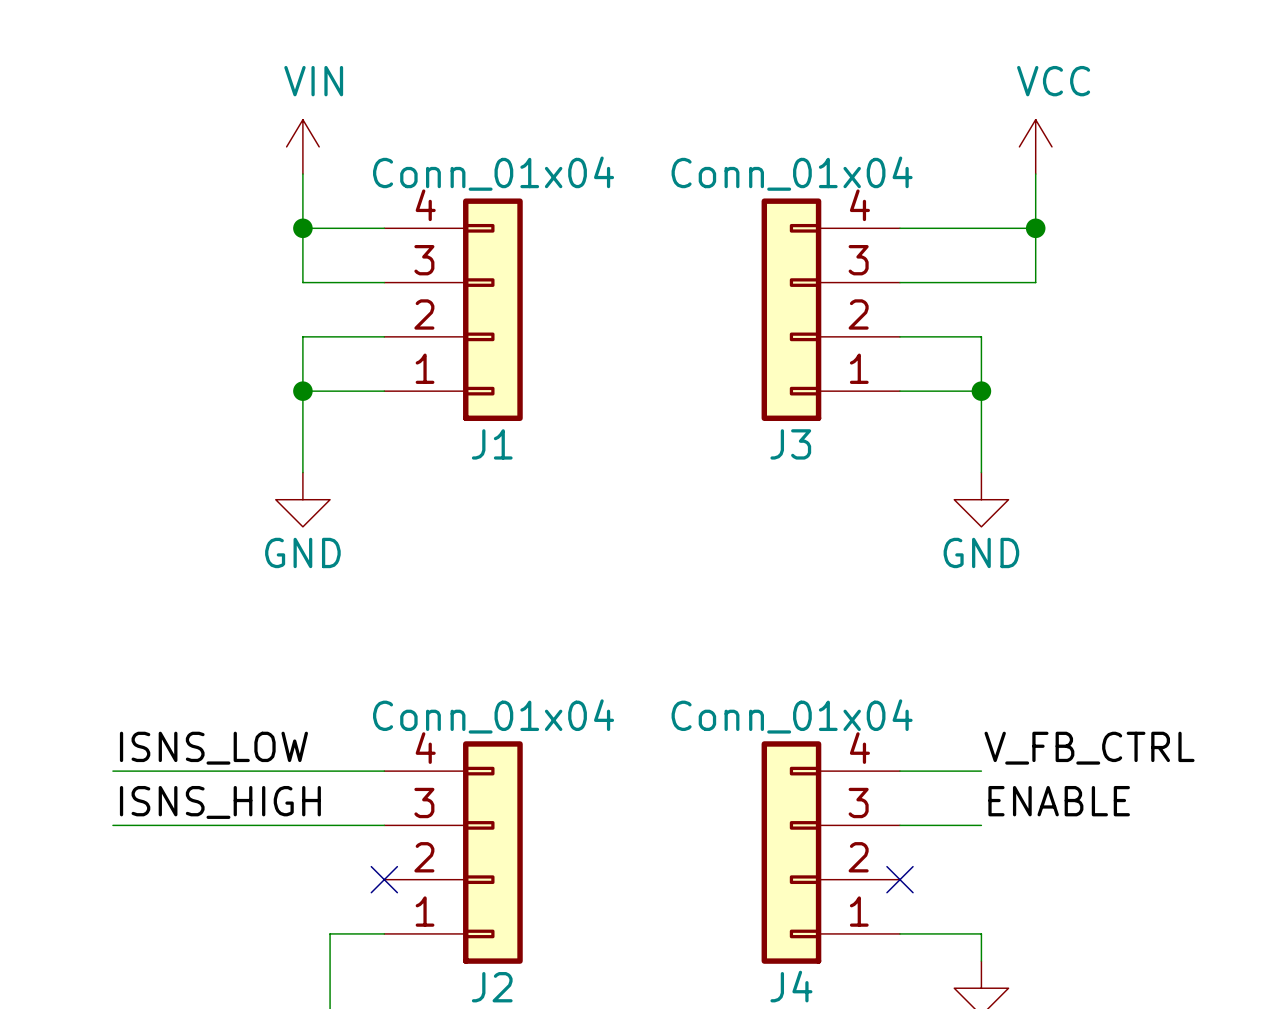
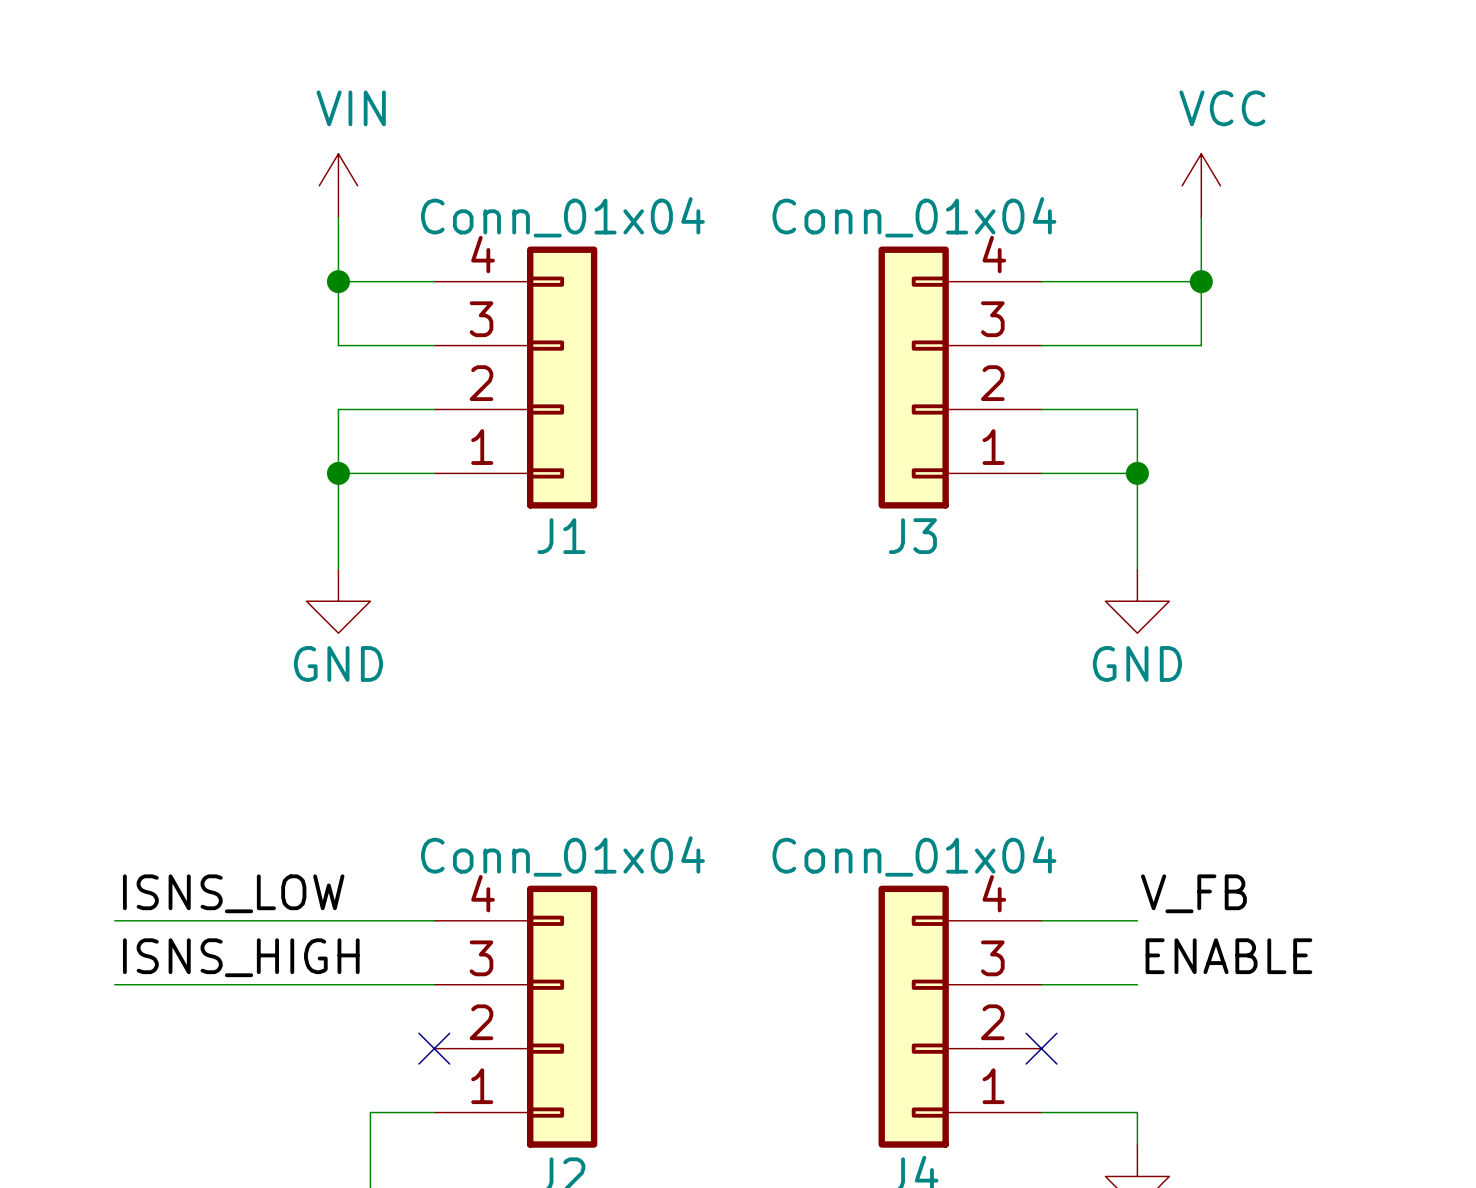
label: V_FB_CTRL (1089, 748) -> V_FB (1193, 893)

